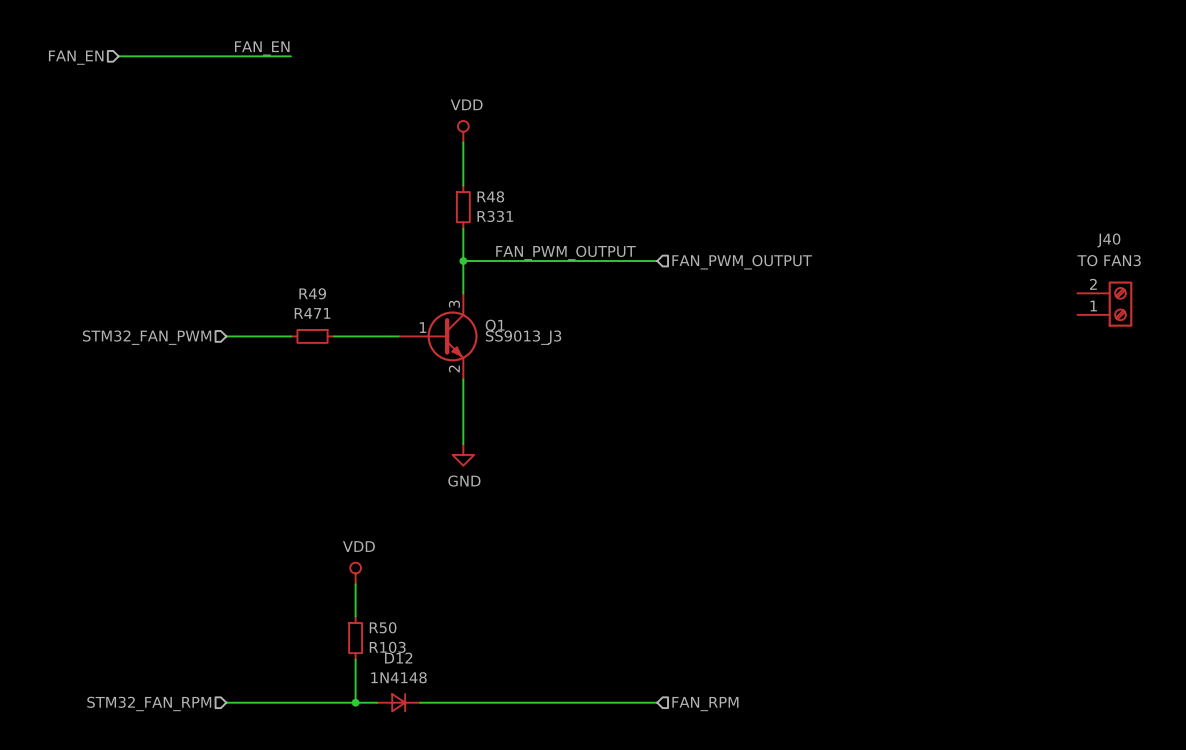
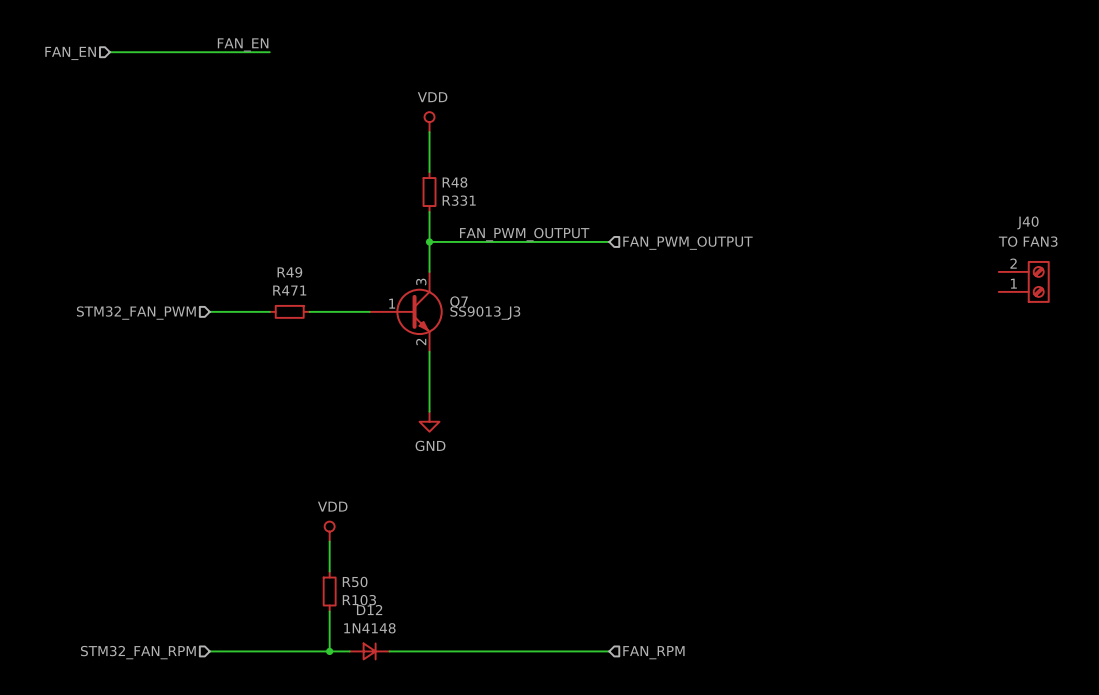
Q1 name: Q1 (495, 326) -> Q7 (459, 302)

